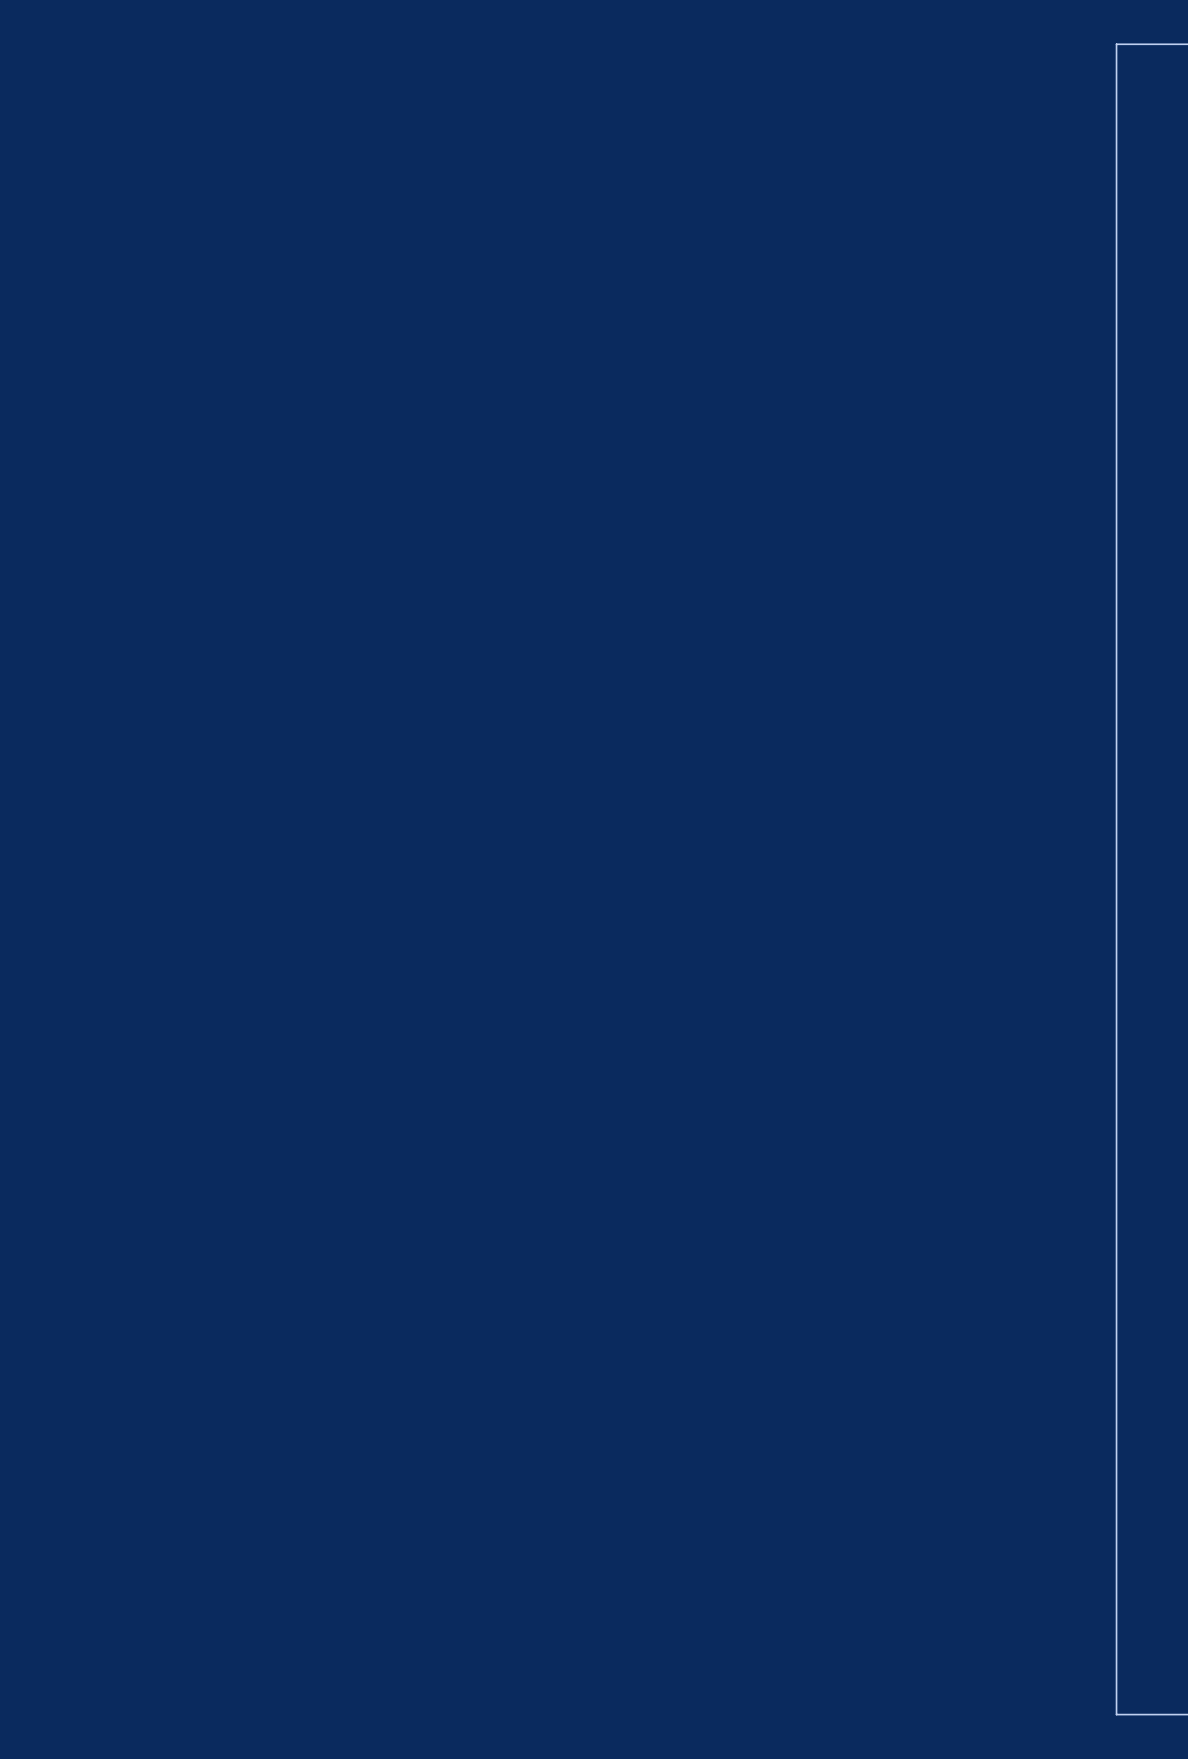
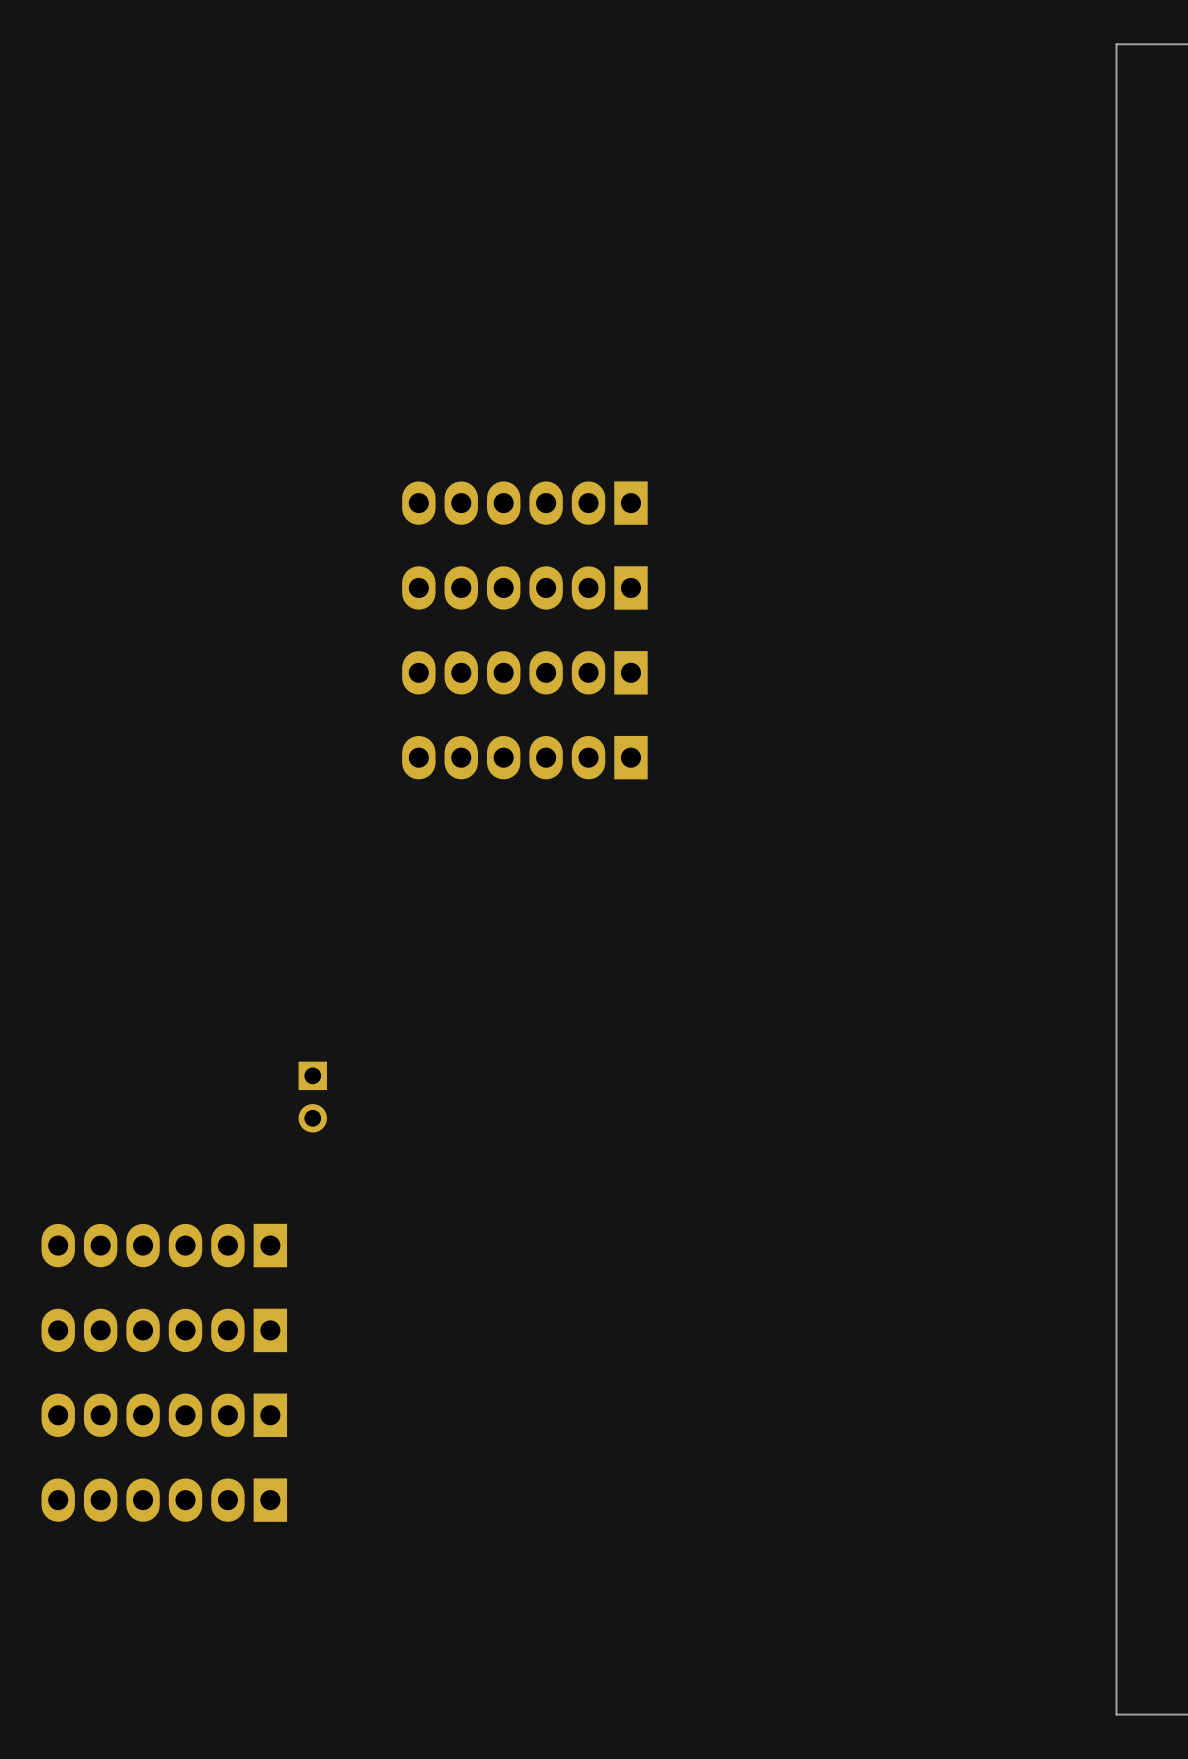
part: none -> (524, 503)
part: none -> (524, 587)
part: none -> (524, 672)
part: none -> (524, 757)
part: none -> (312, 1097)
part: none -> (164, 1245)
part: none -> (164, 1330)
part: none -> (164, 1415)
part: none -> (164, 1500)

